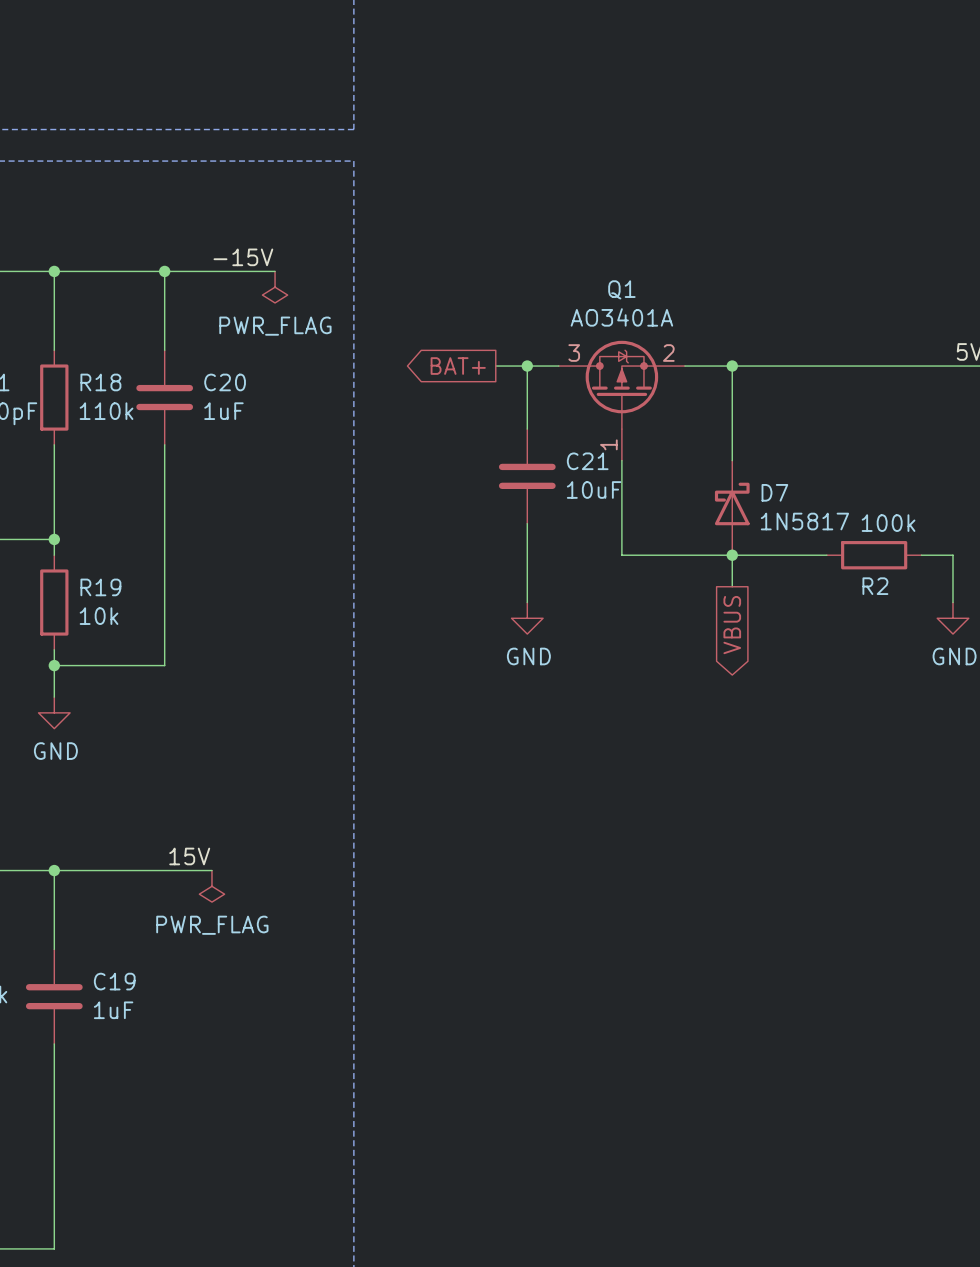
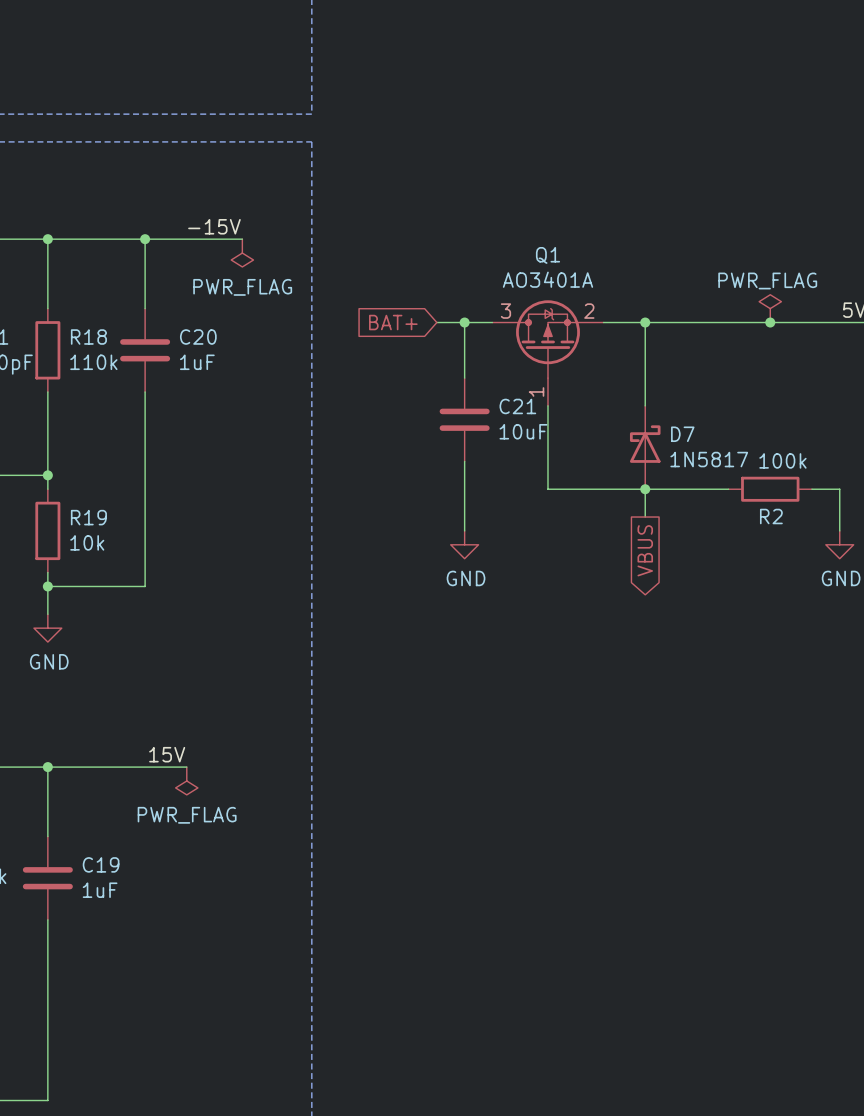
power symbol: none -> PWR_FLAG (770, 308)
global label shape: output (458, 366) -> input (393, 322)
junction: none -> (770, 322)

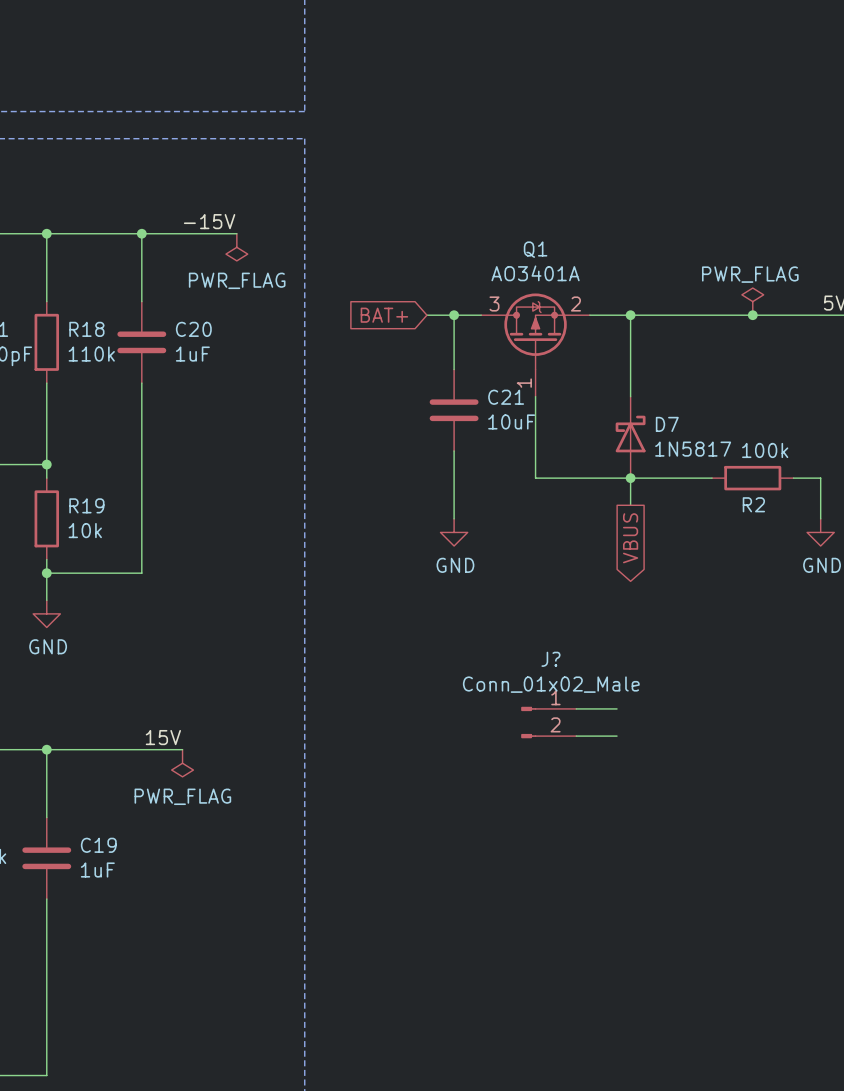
wire: none -> (576, 708) (617, 708)
J?: none -> Conn_01x02_Male (548, 722)
wire: none -> (576, 736) (617, 736)

